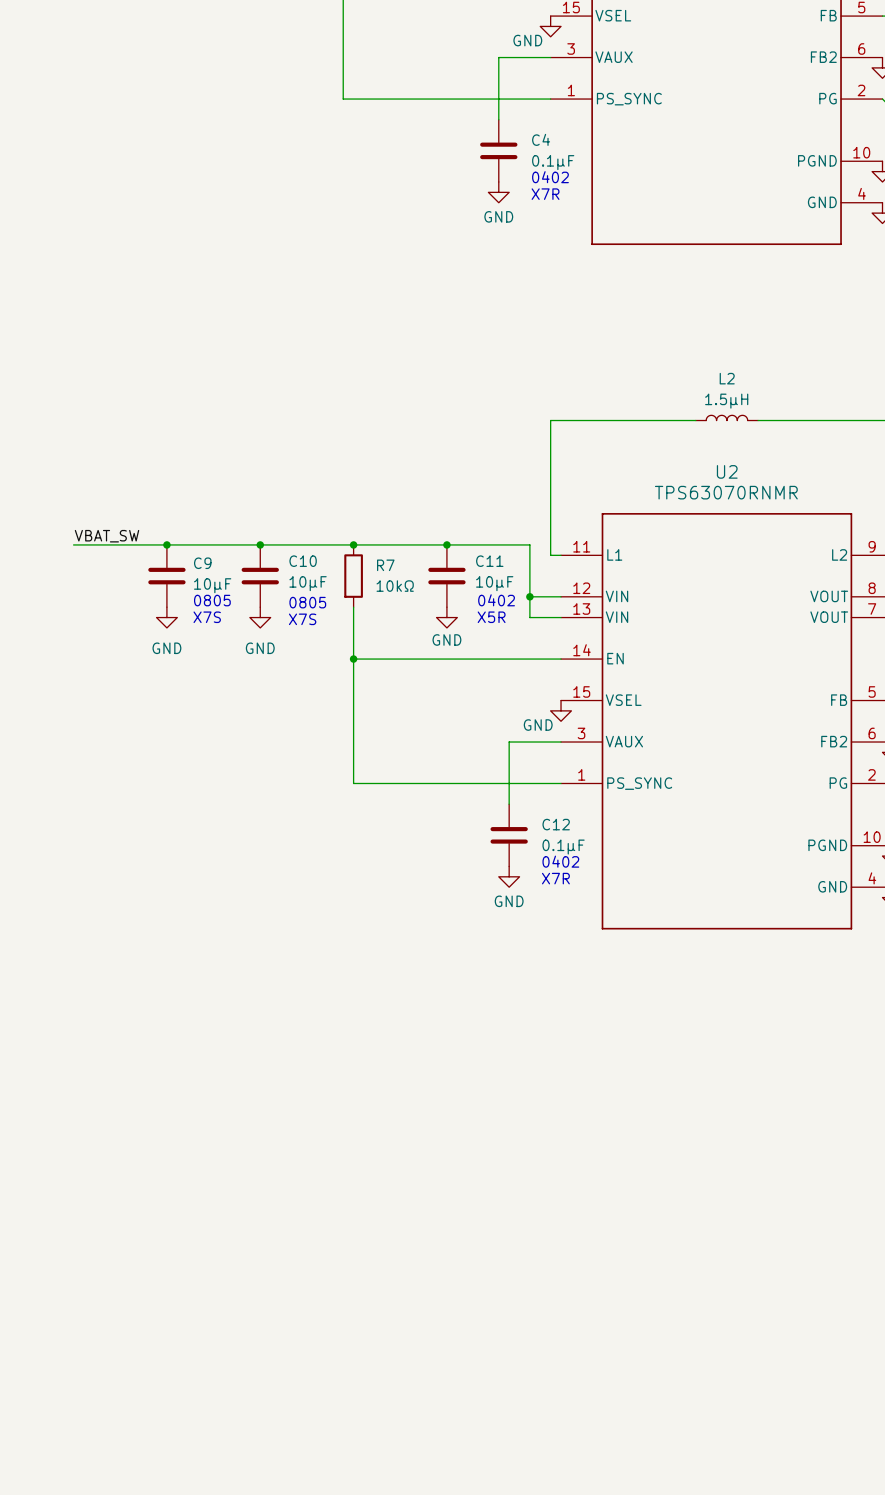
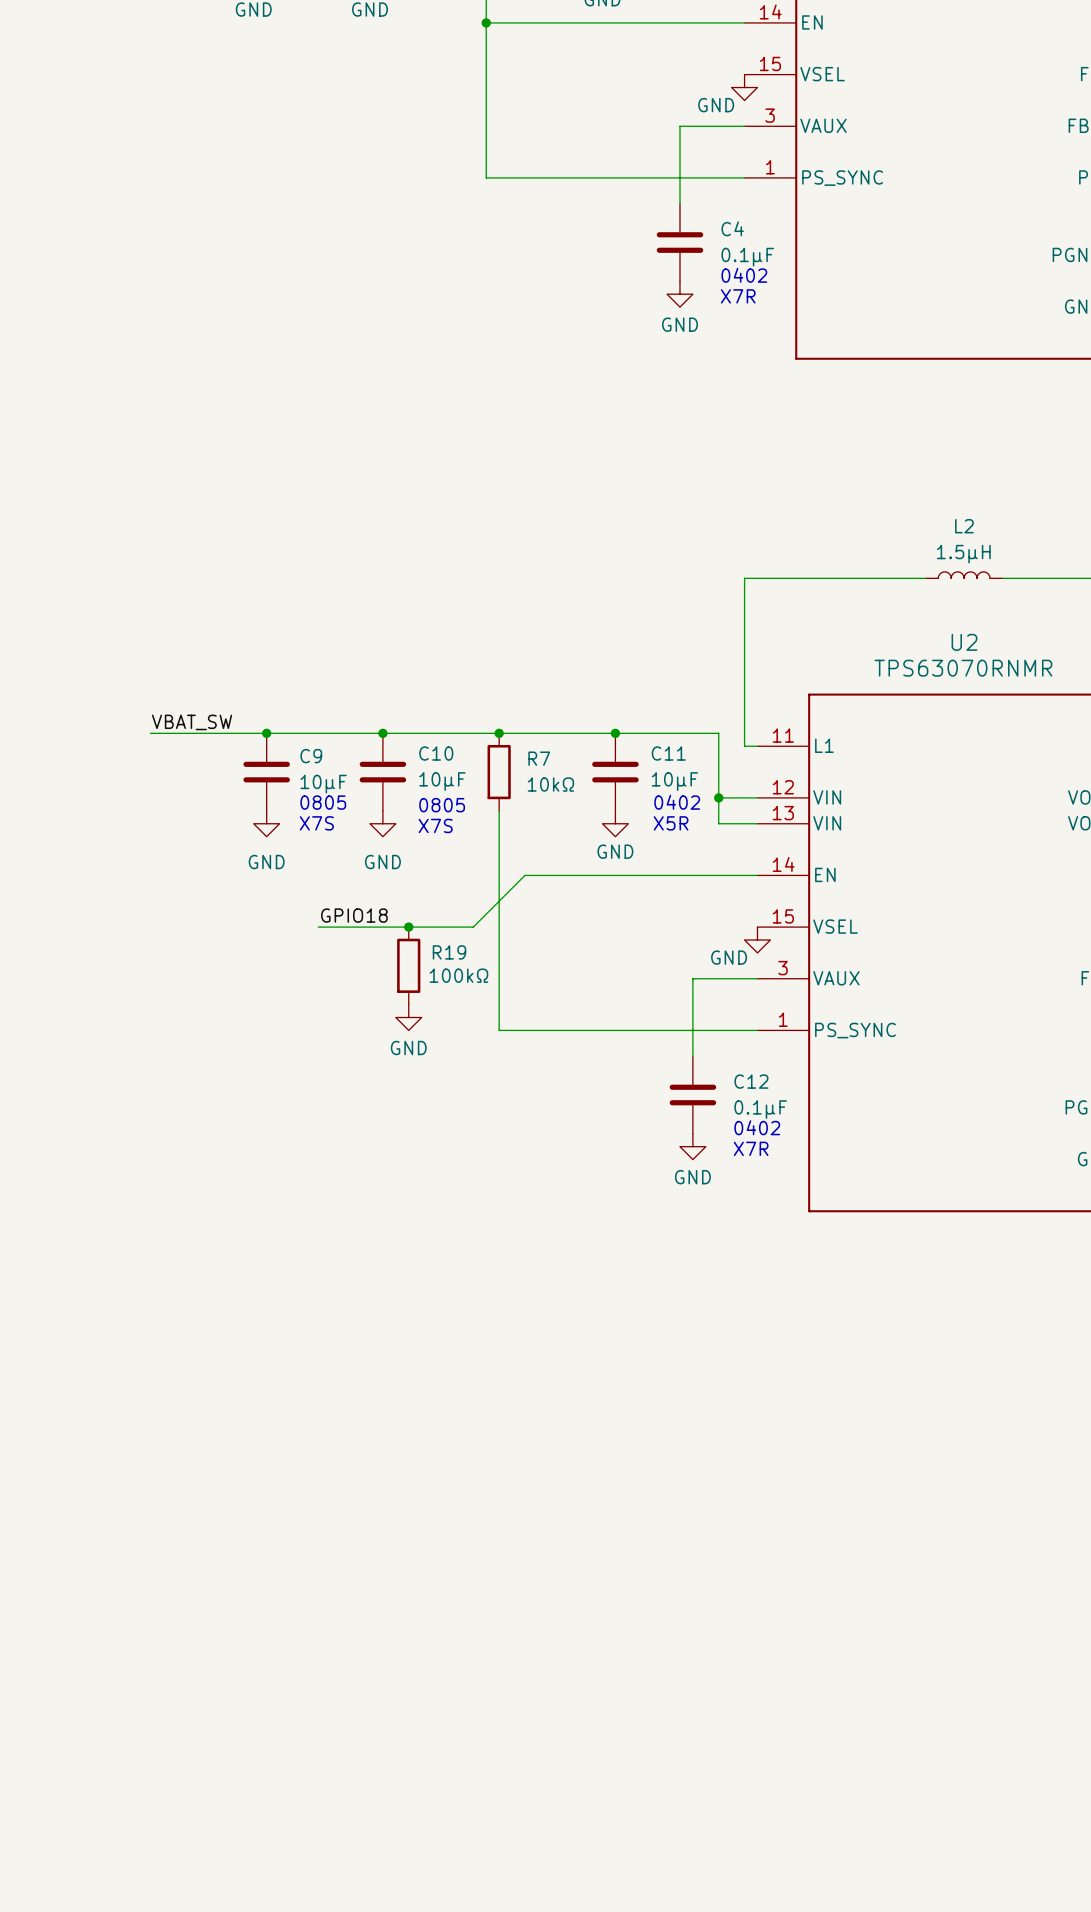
wire: (353, 659) (374, 659) -> (318, 927) (473, 927) (524, 875)
junction: (353, 659) -> none
label: none -> GPIO18 (354, 915)
junction: none -> (408, 927)
R19: none -> 100kΩ (408, 965)
power symbol: none -> GND (408, 1017)

